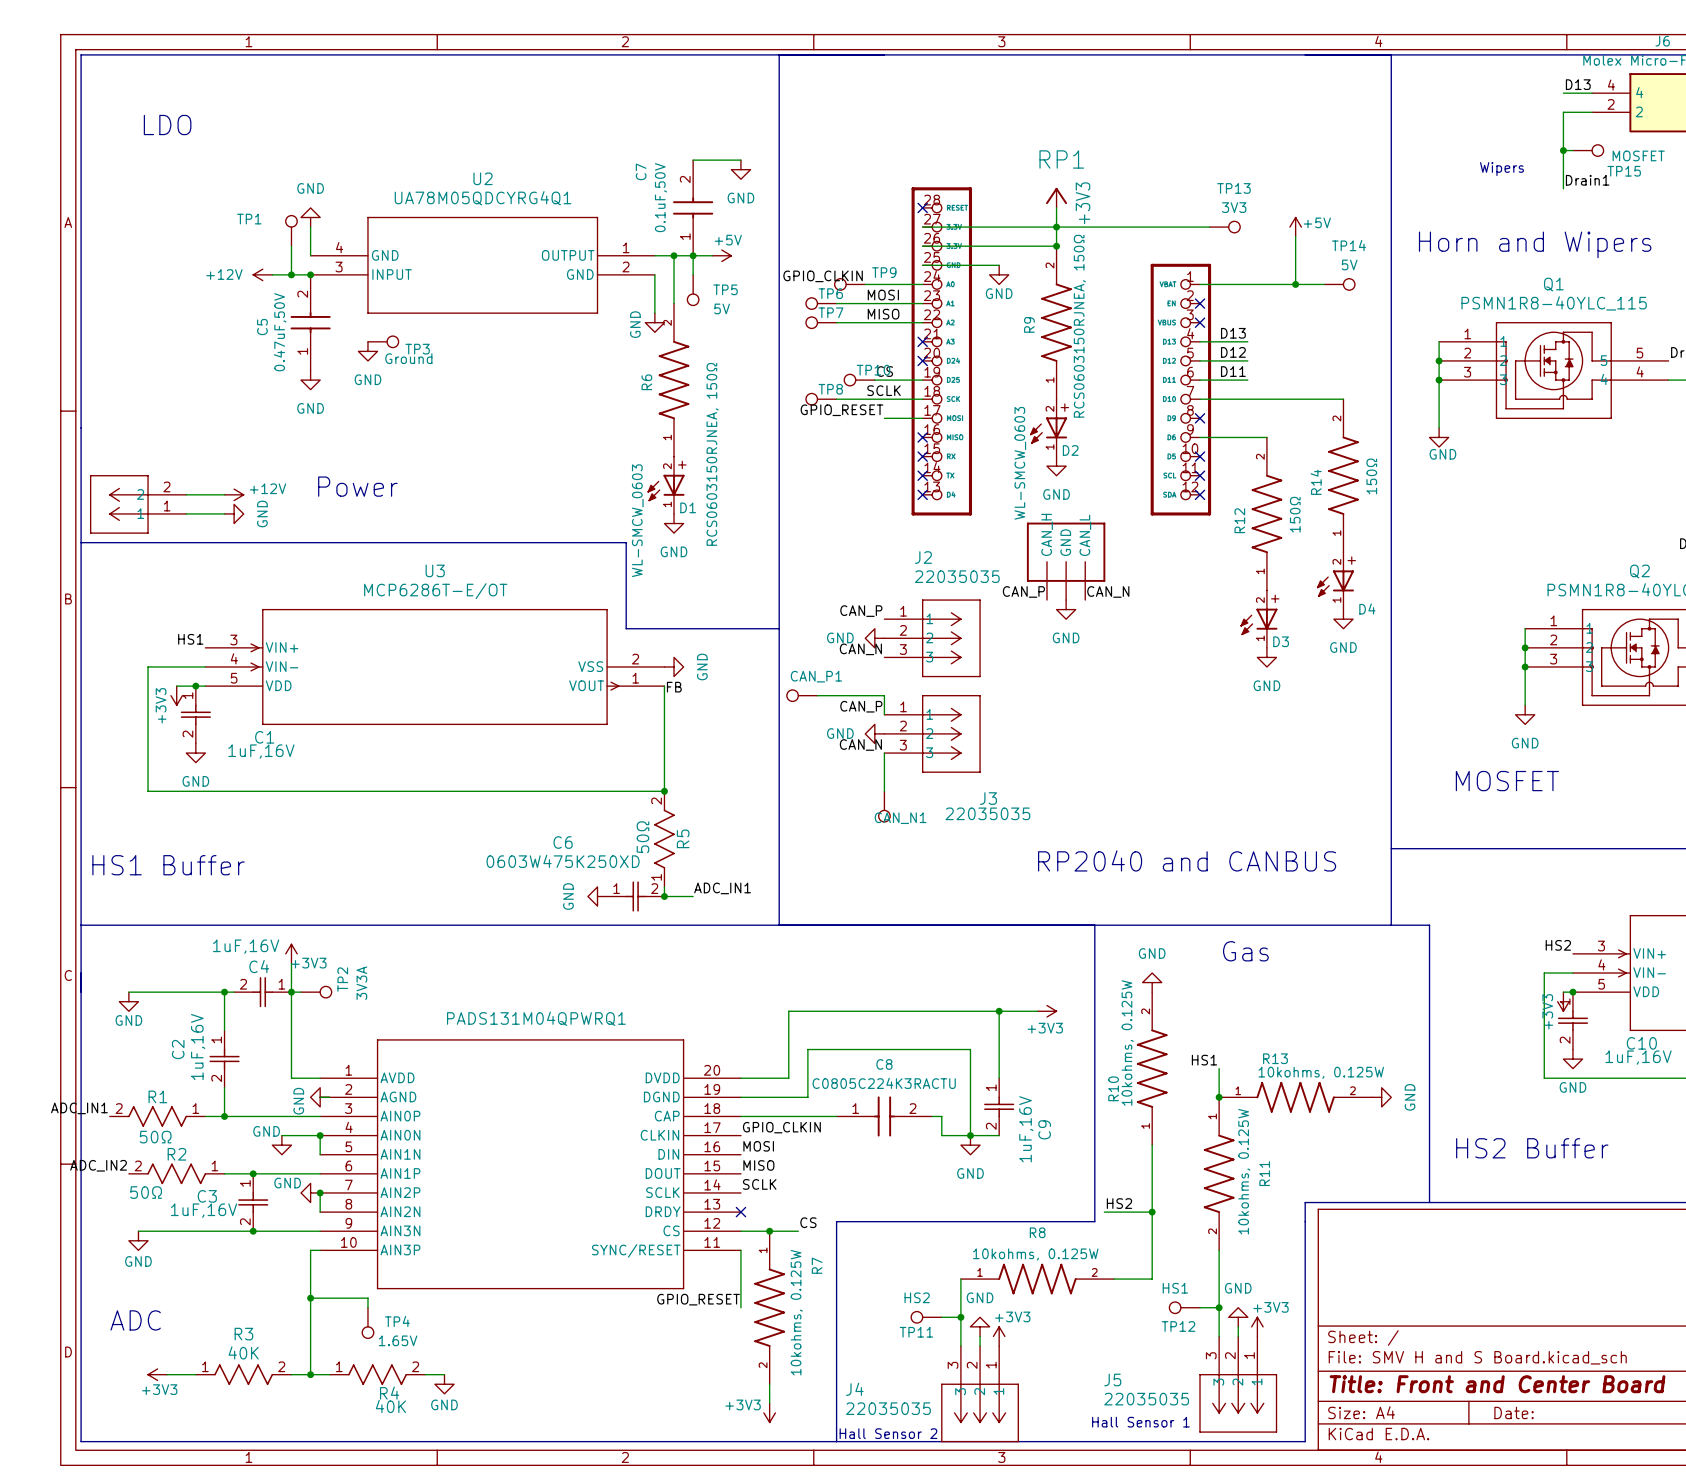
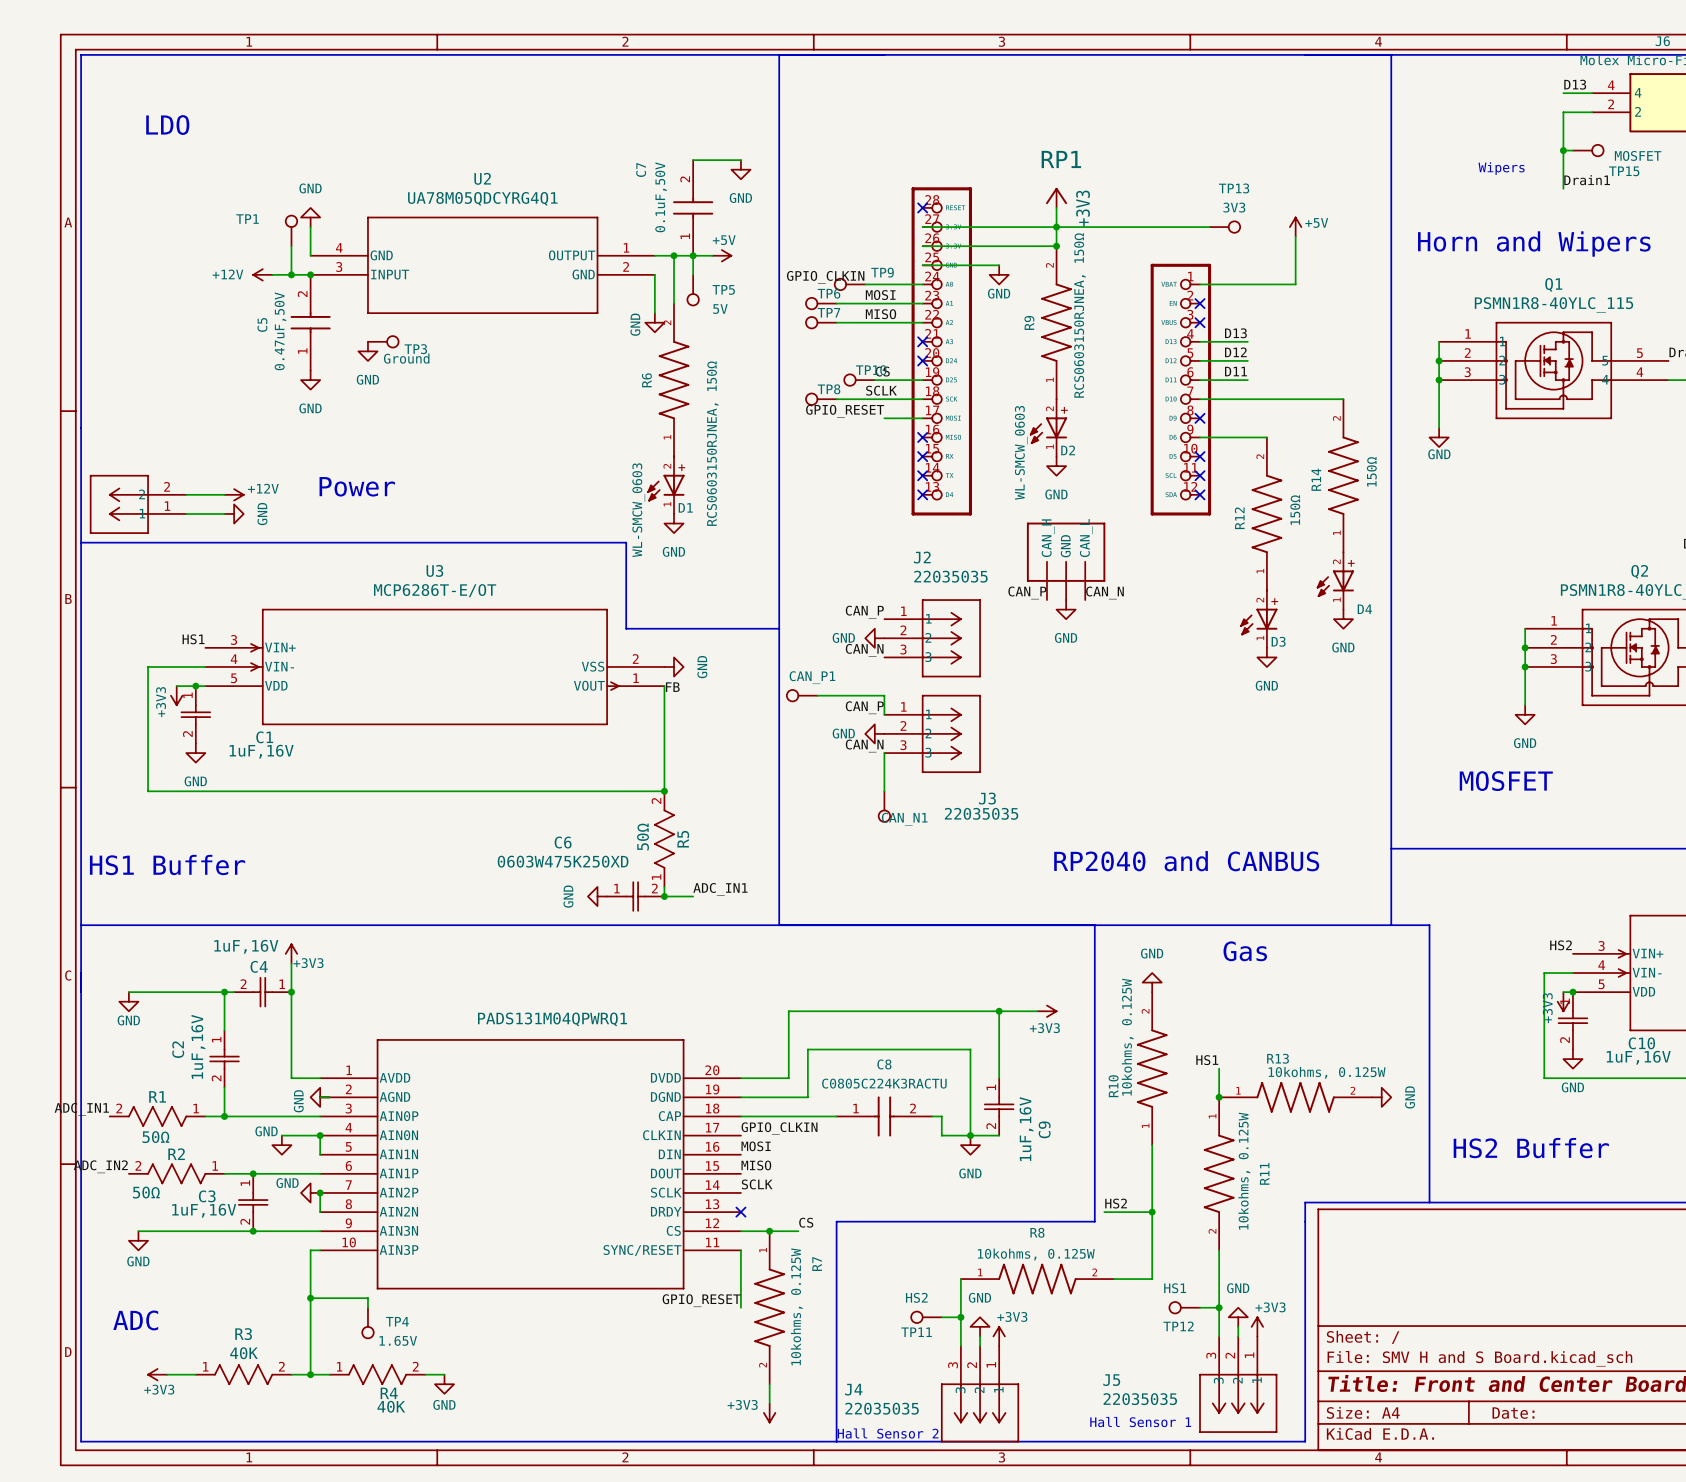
wire: (1295, 284) (1324, 284) -> none
junction: (1295, 284) -> none
TP14: 5V (1339, 284) -> none
wire: (291, 992) (301, 992) -> none
TP2: 3V3A (316, 992) -> none

